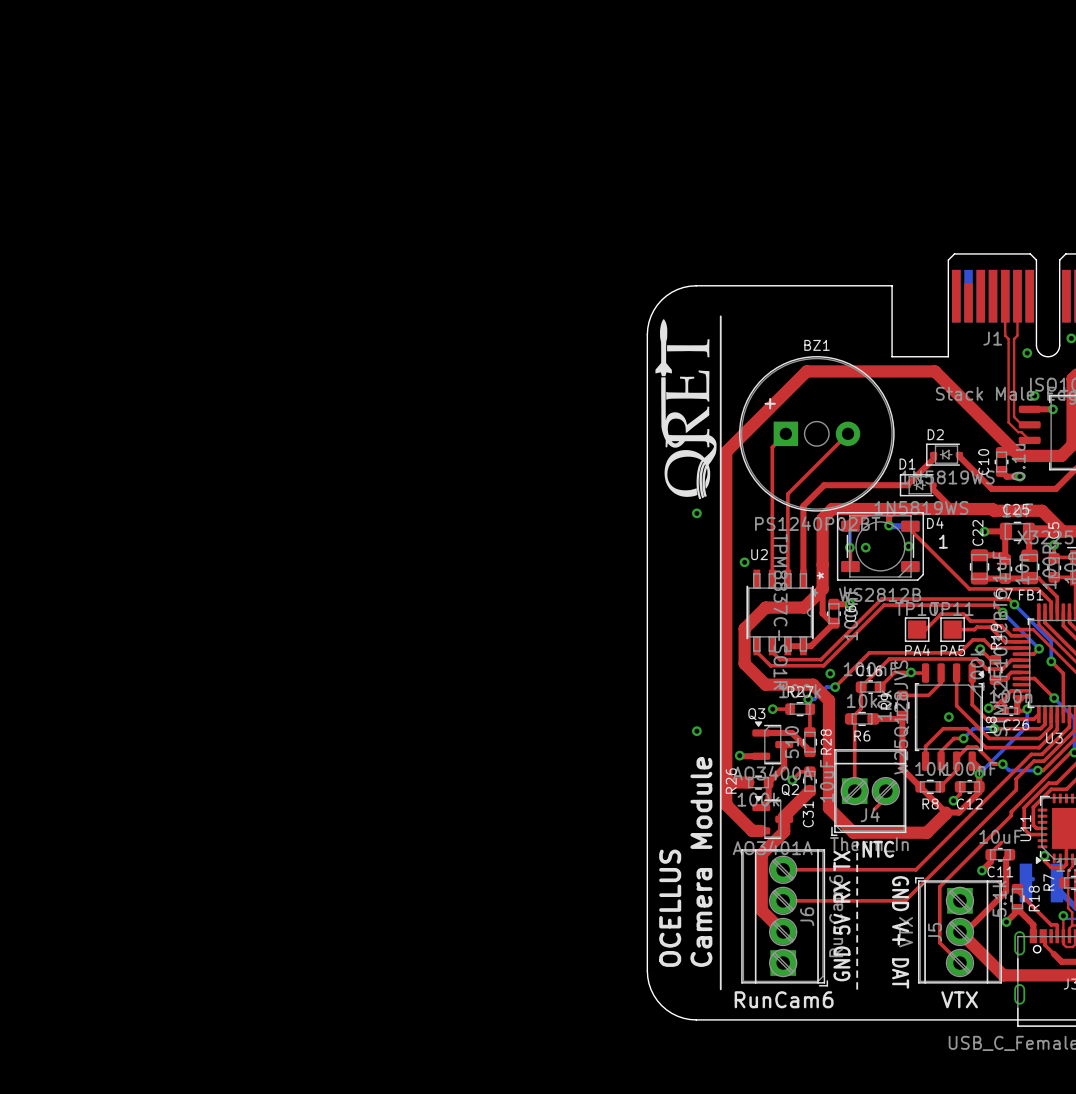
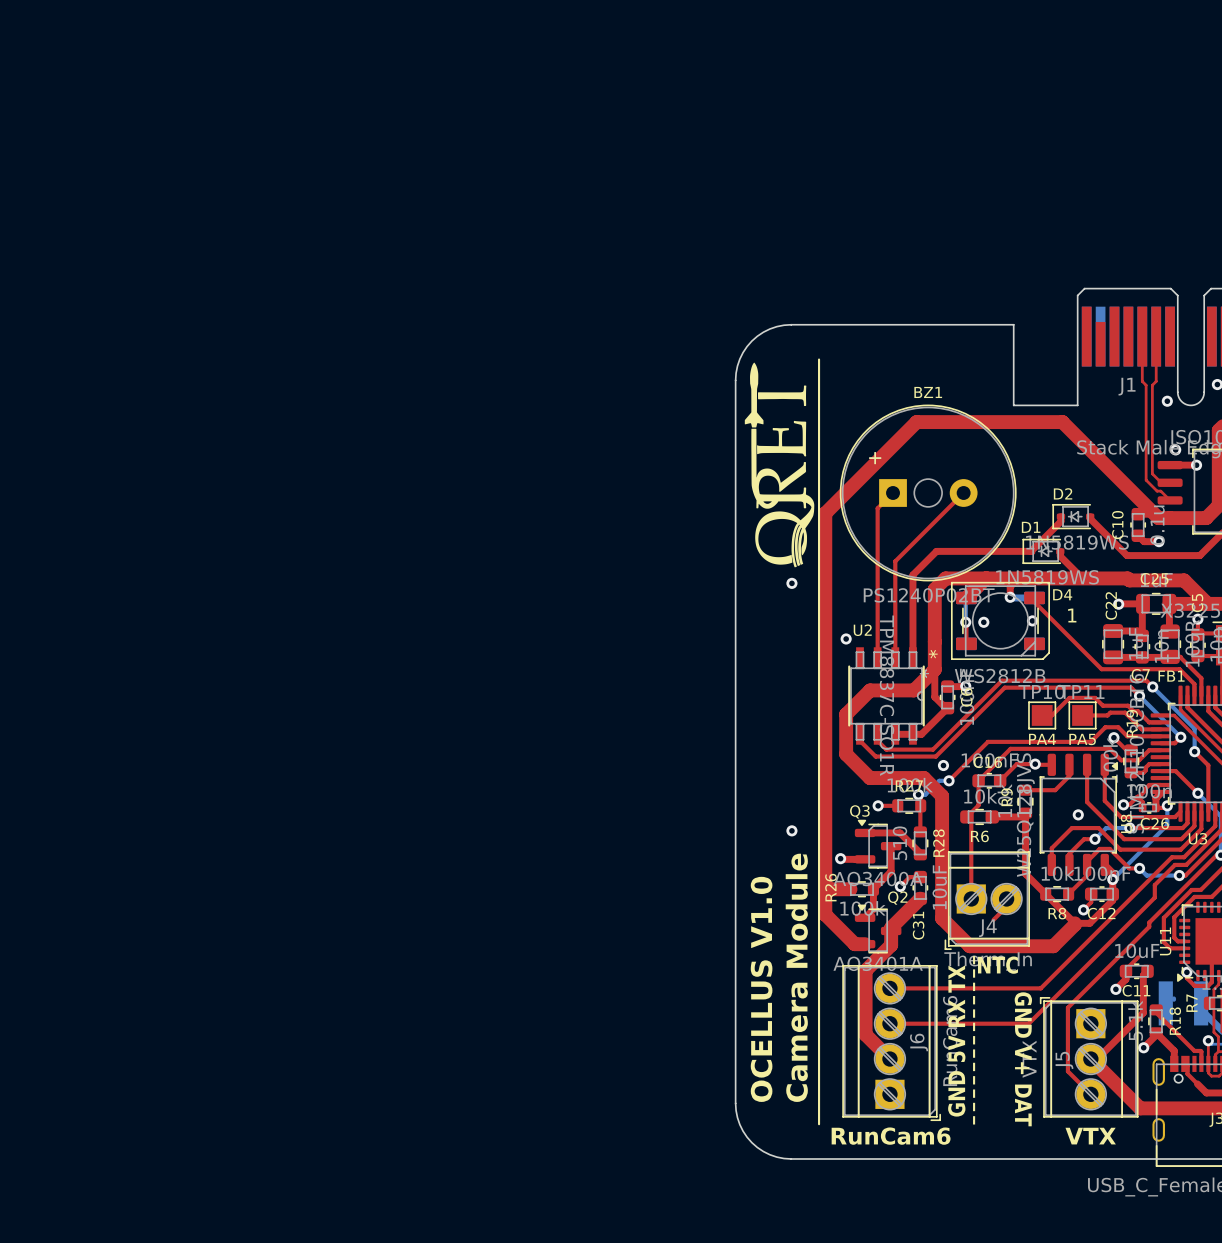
text: OCELLUS (670, 908) -> OCELLUS V1.0 (761, 989)

